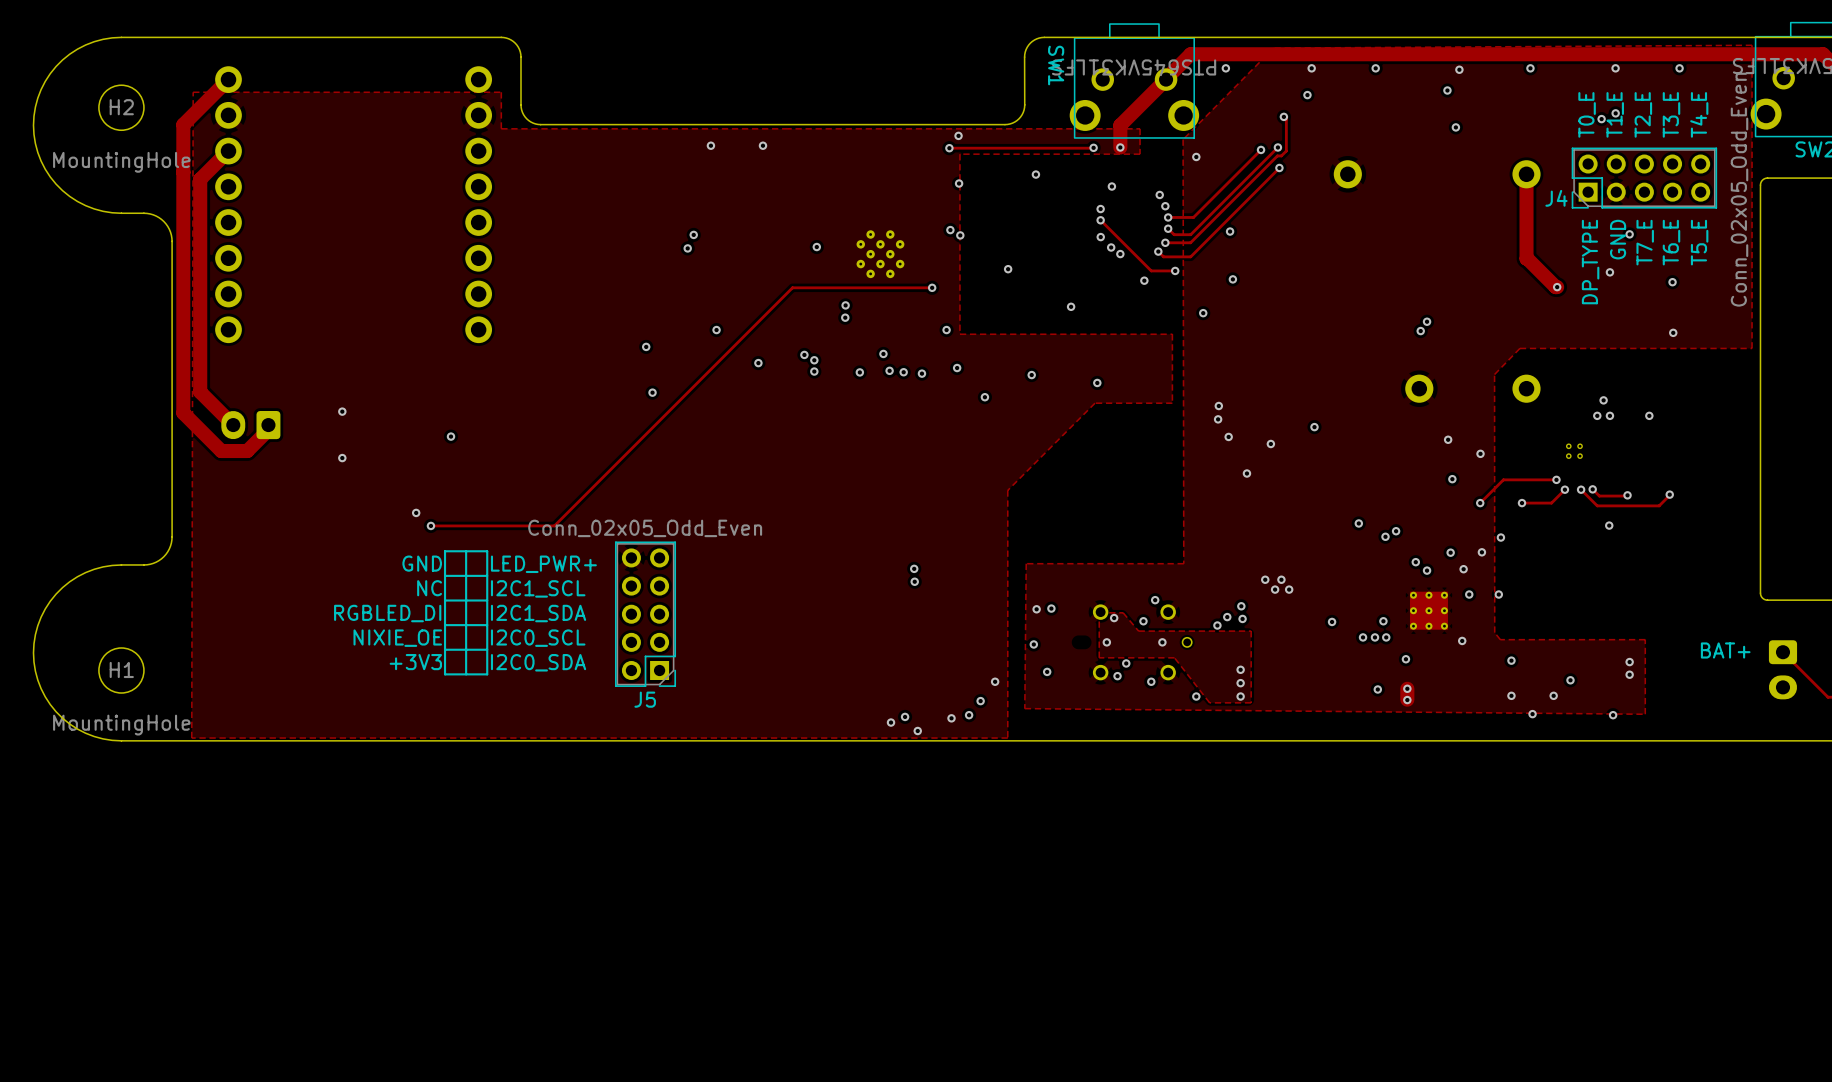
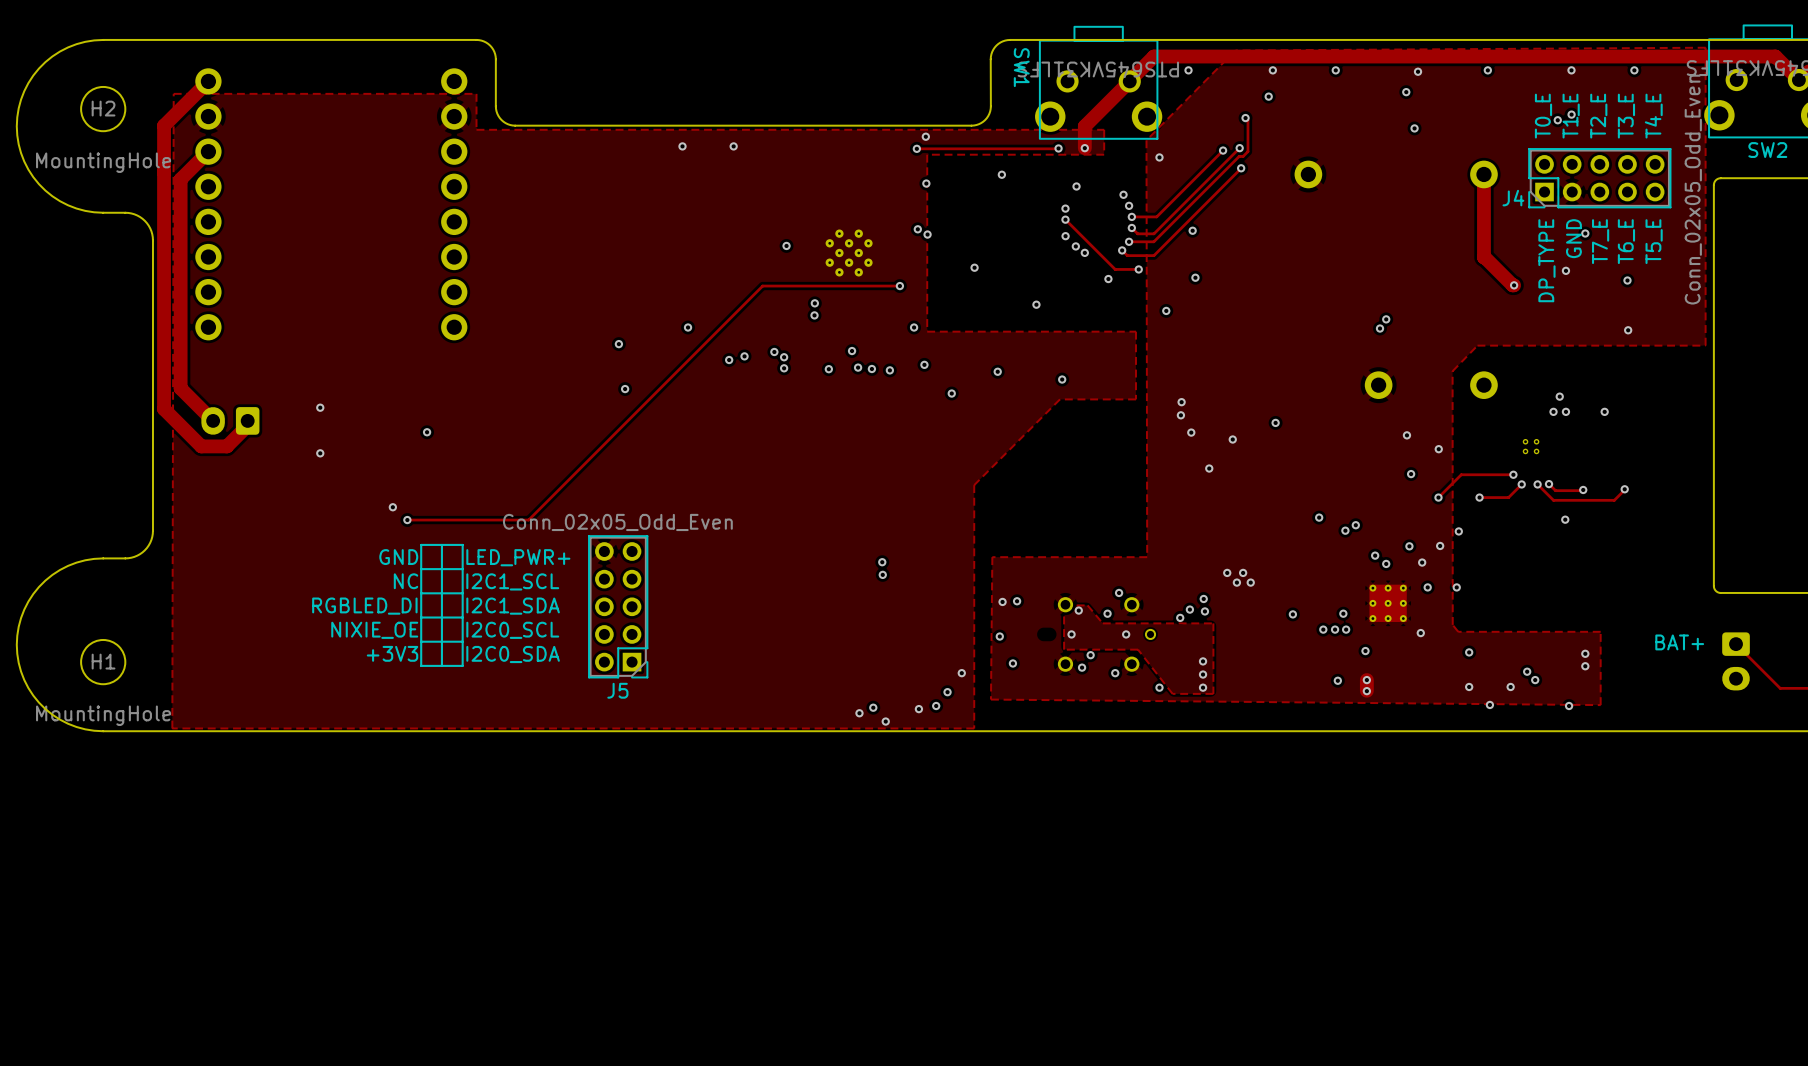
via: (693, 234) -> none
via: (687, 248) -> none
via: none -> (744, 356)
via: none -> (1535, 680)

